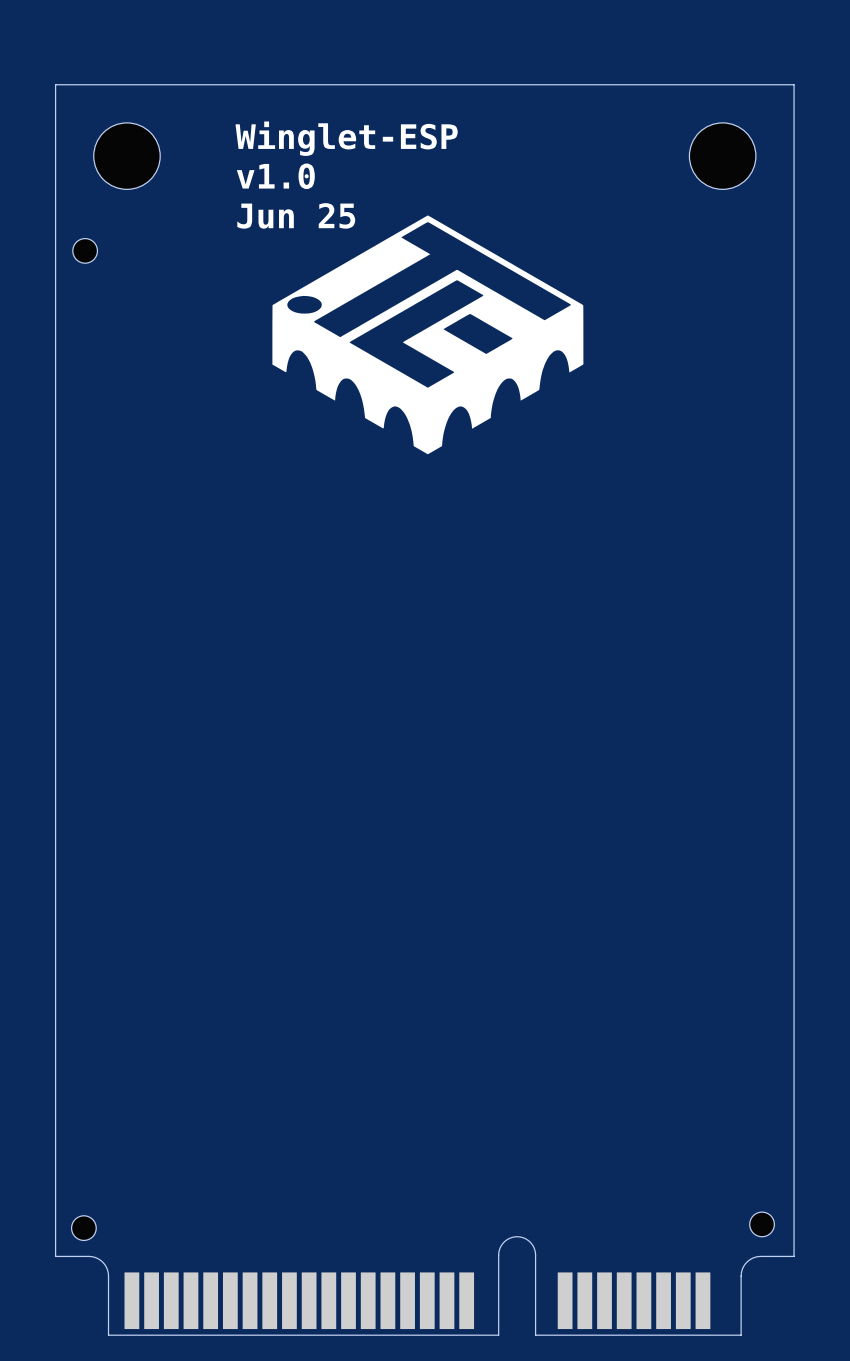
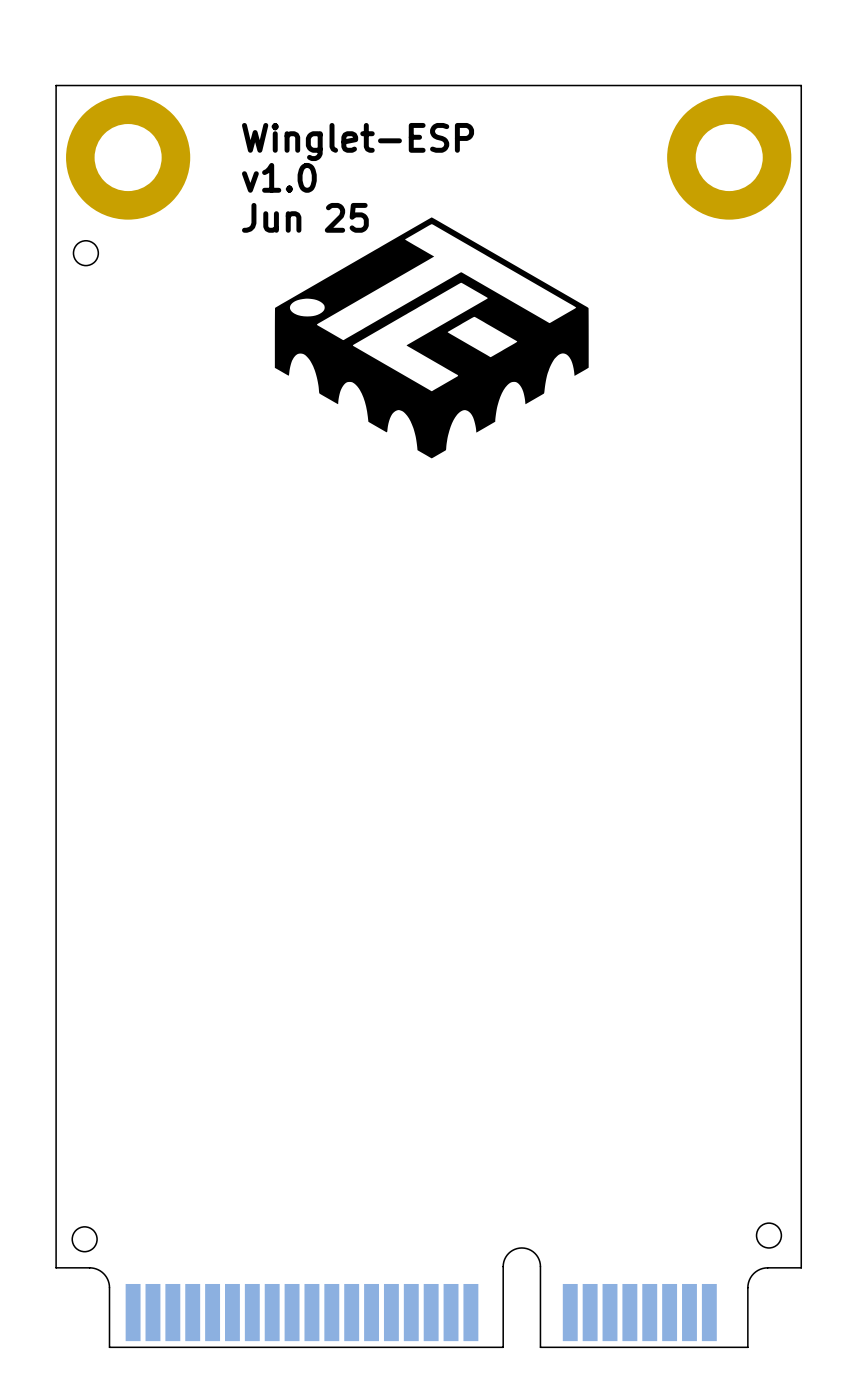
part footprint: [93, 122, 161, 190] -> [66, 95, 191, 220]
part footprint: [689, 122, 756, 190] -> [667, 95, 792, 220]

